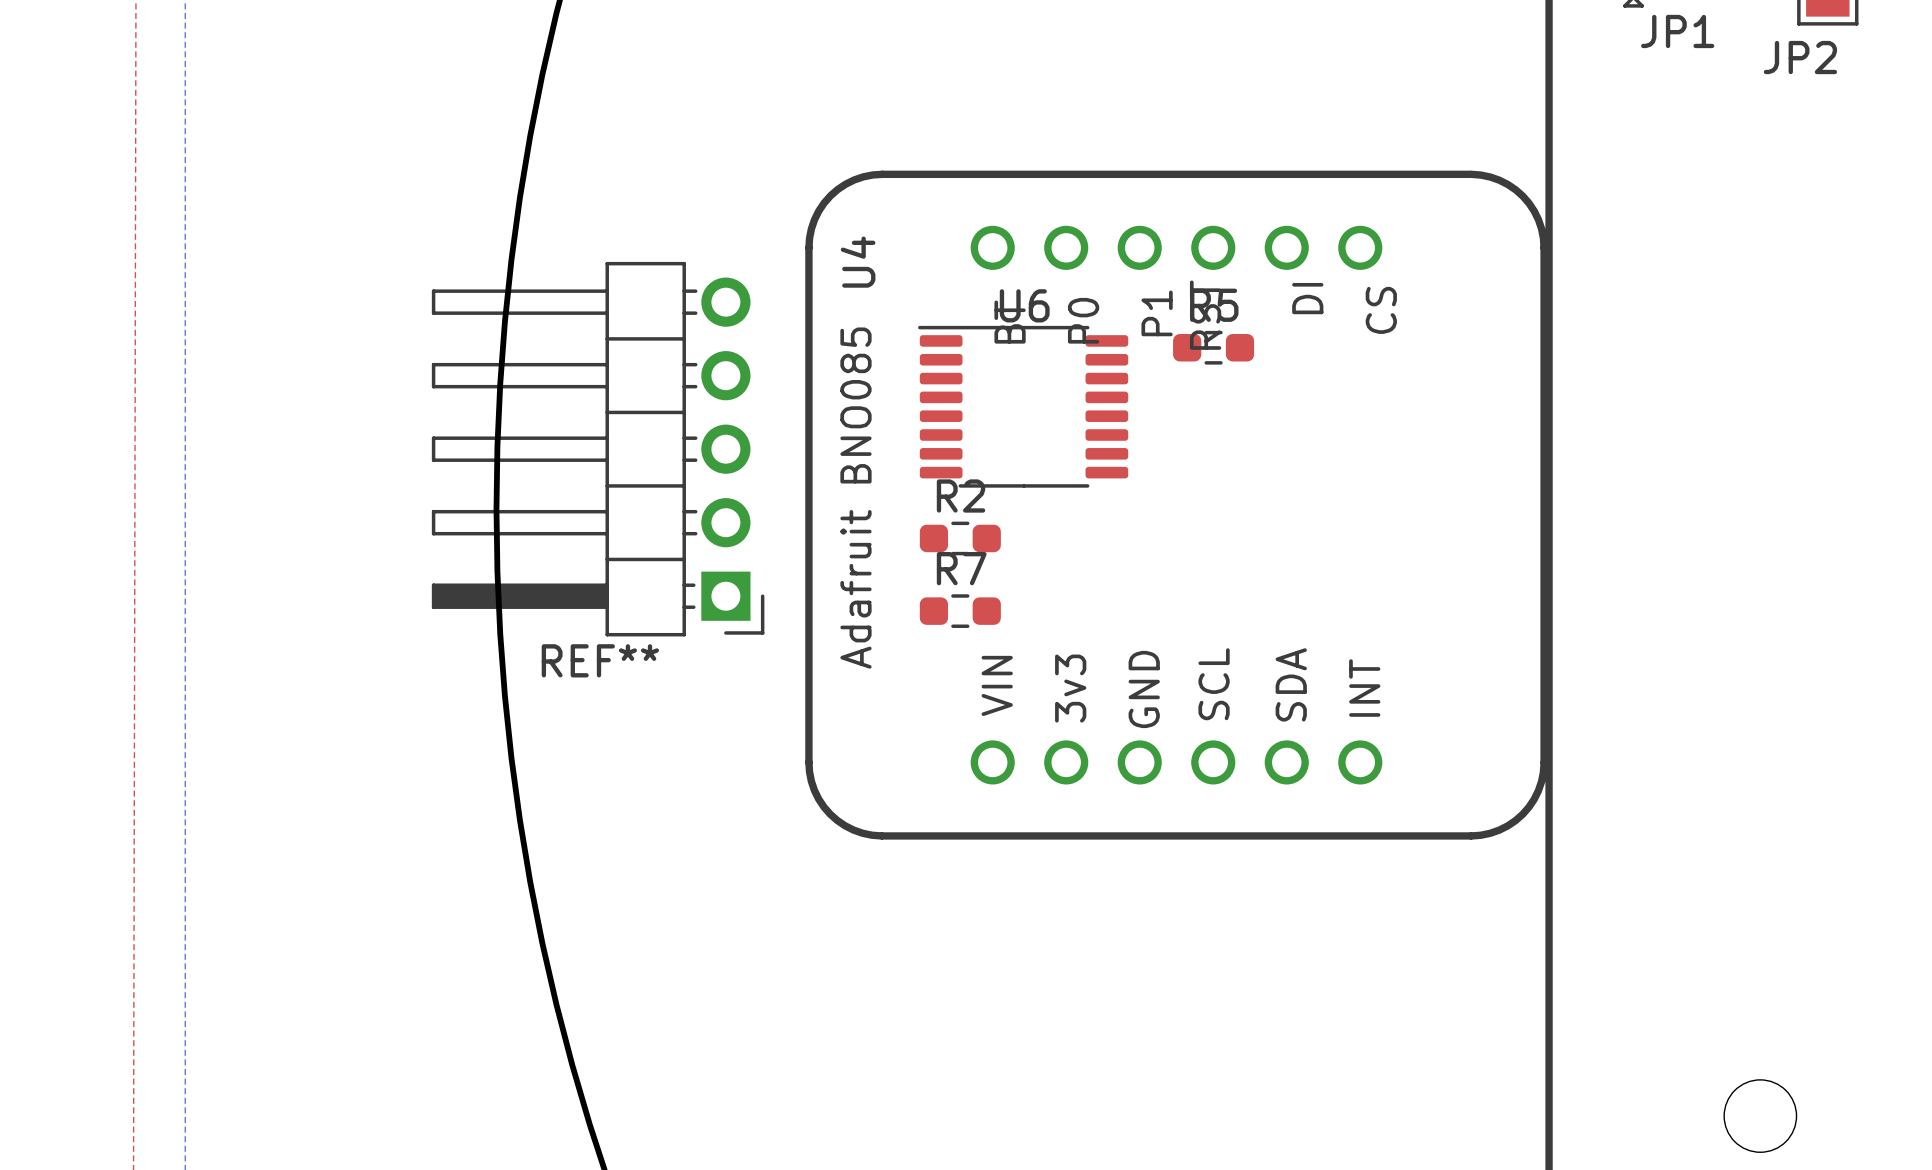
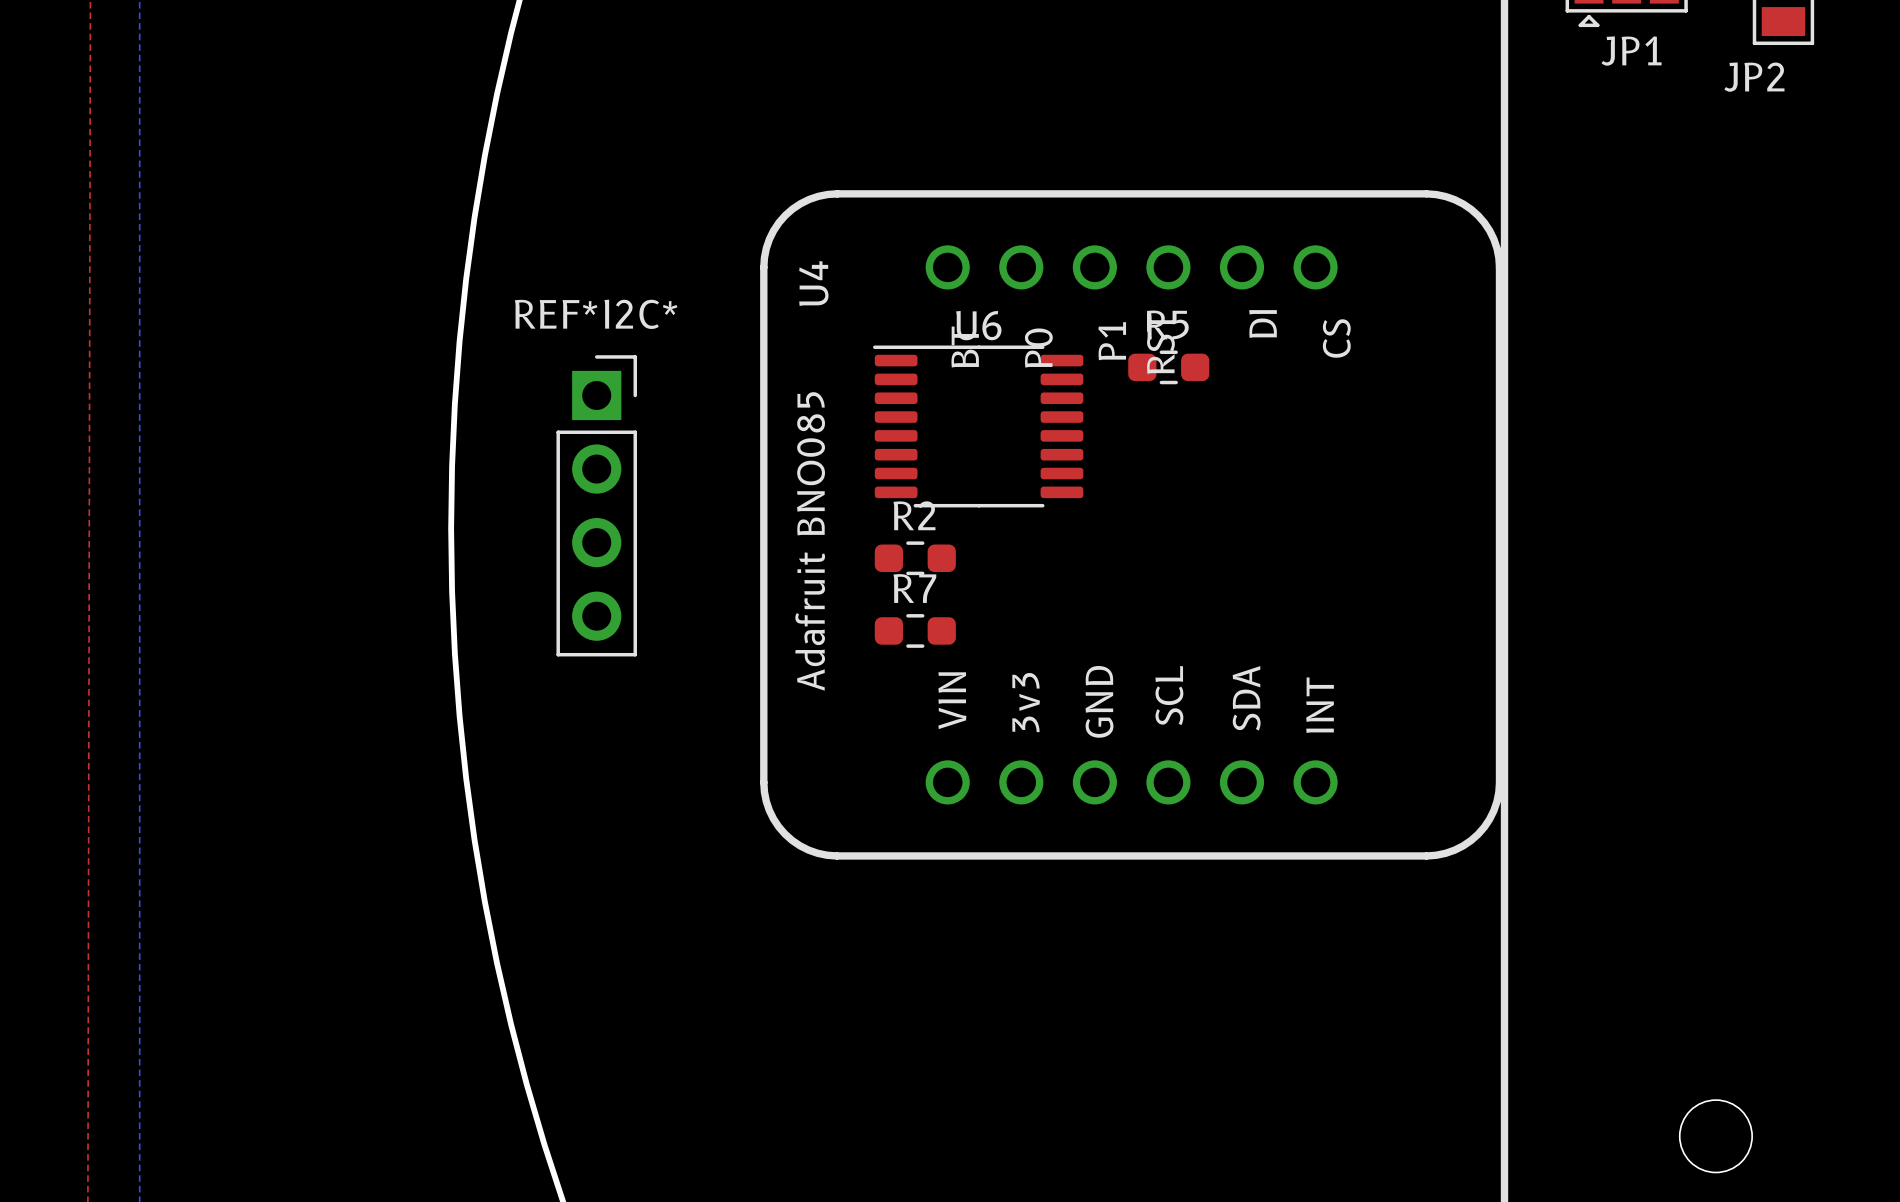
REF**: (598, 449) -> none
REF*I2C*: none -> (596, 505)

